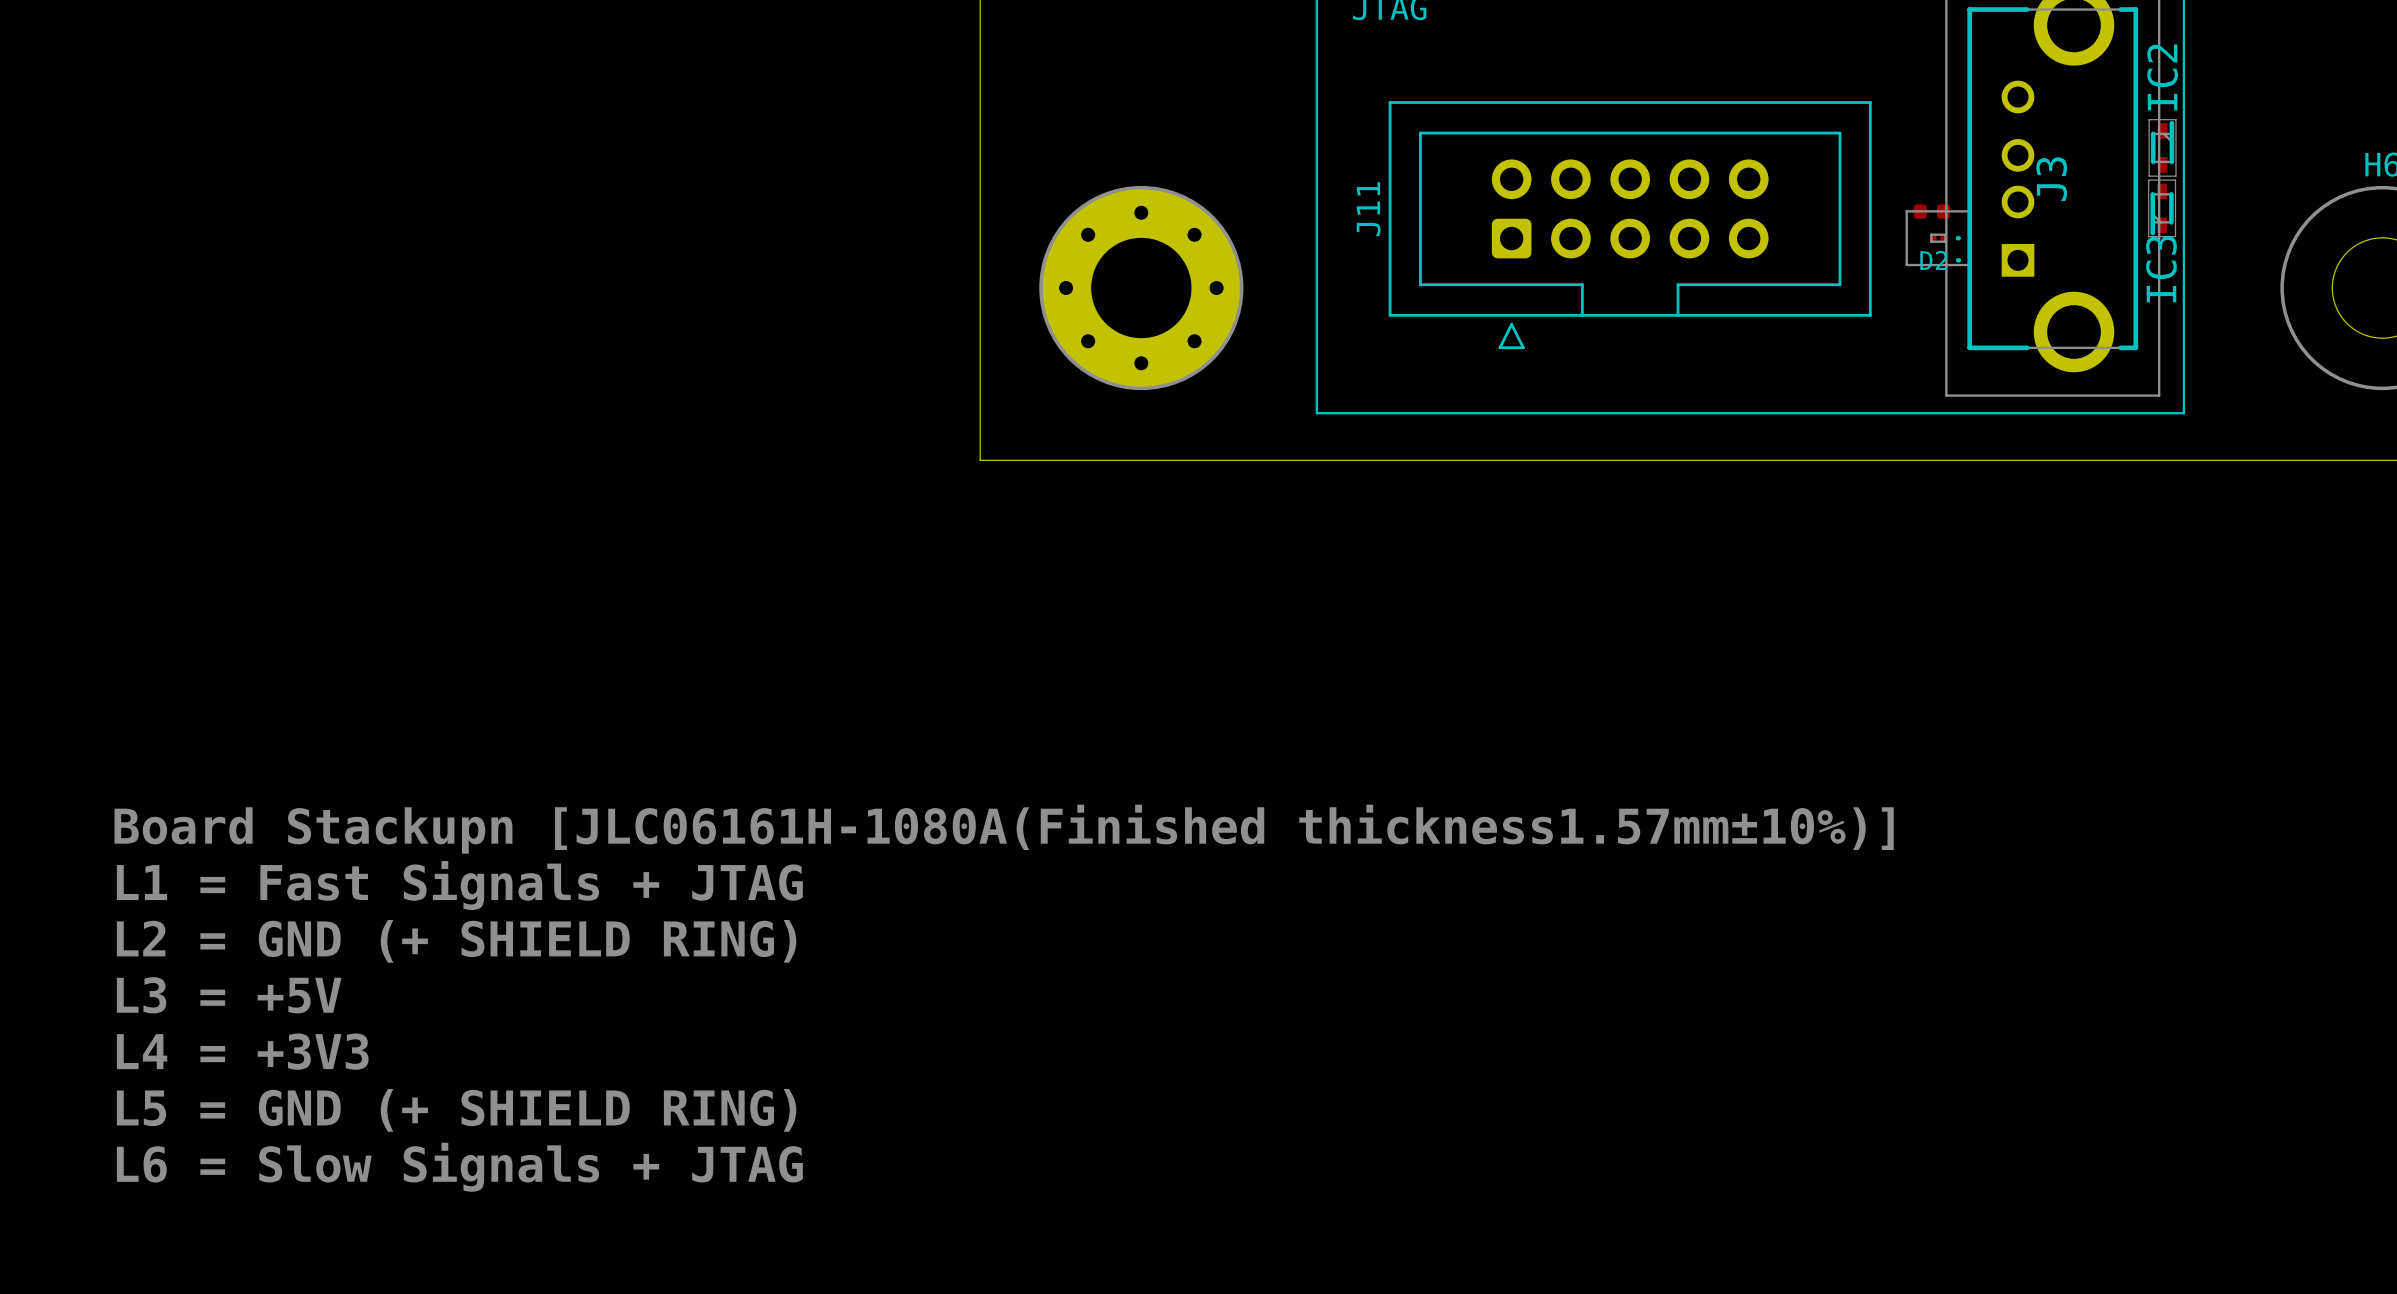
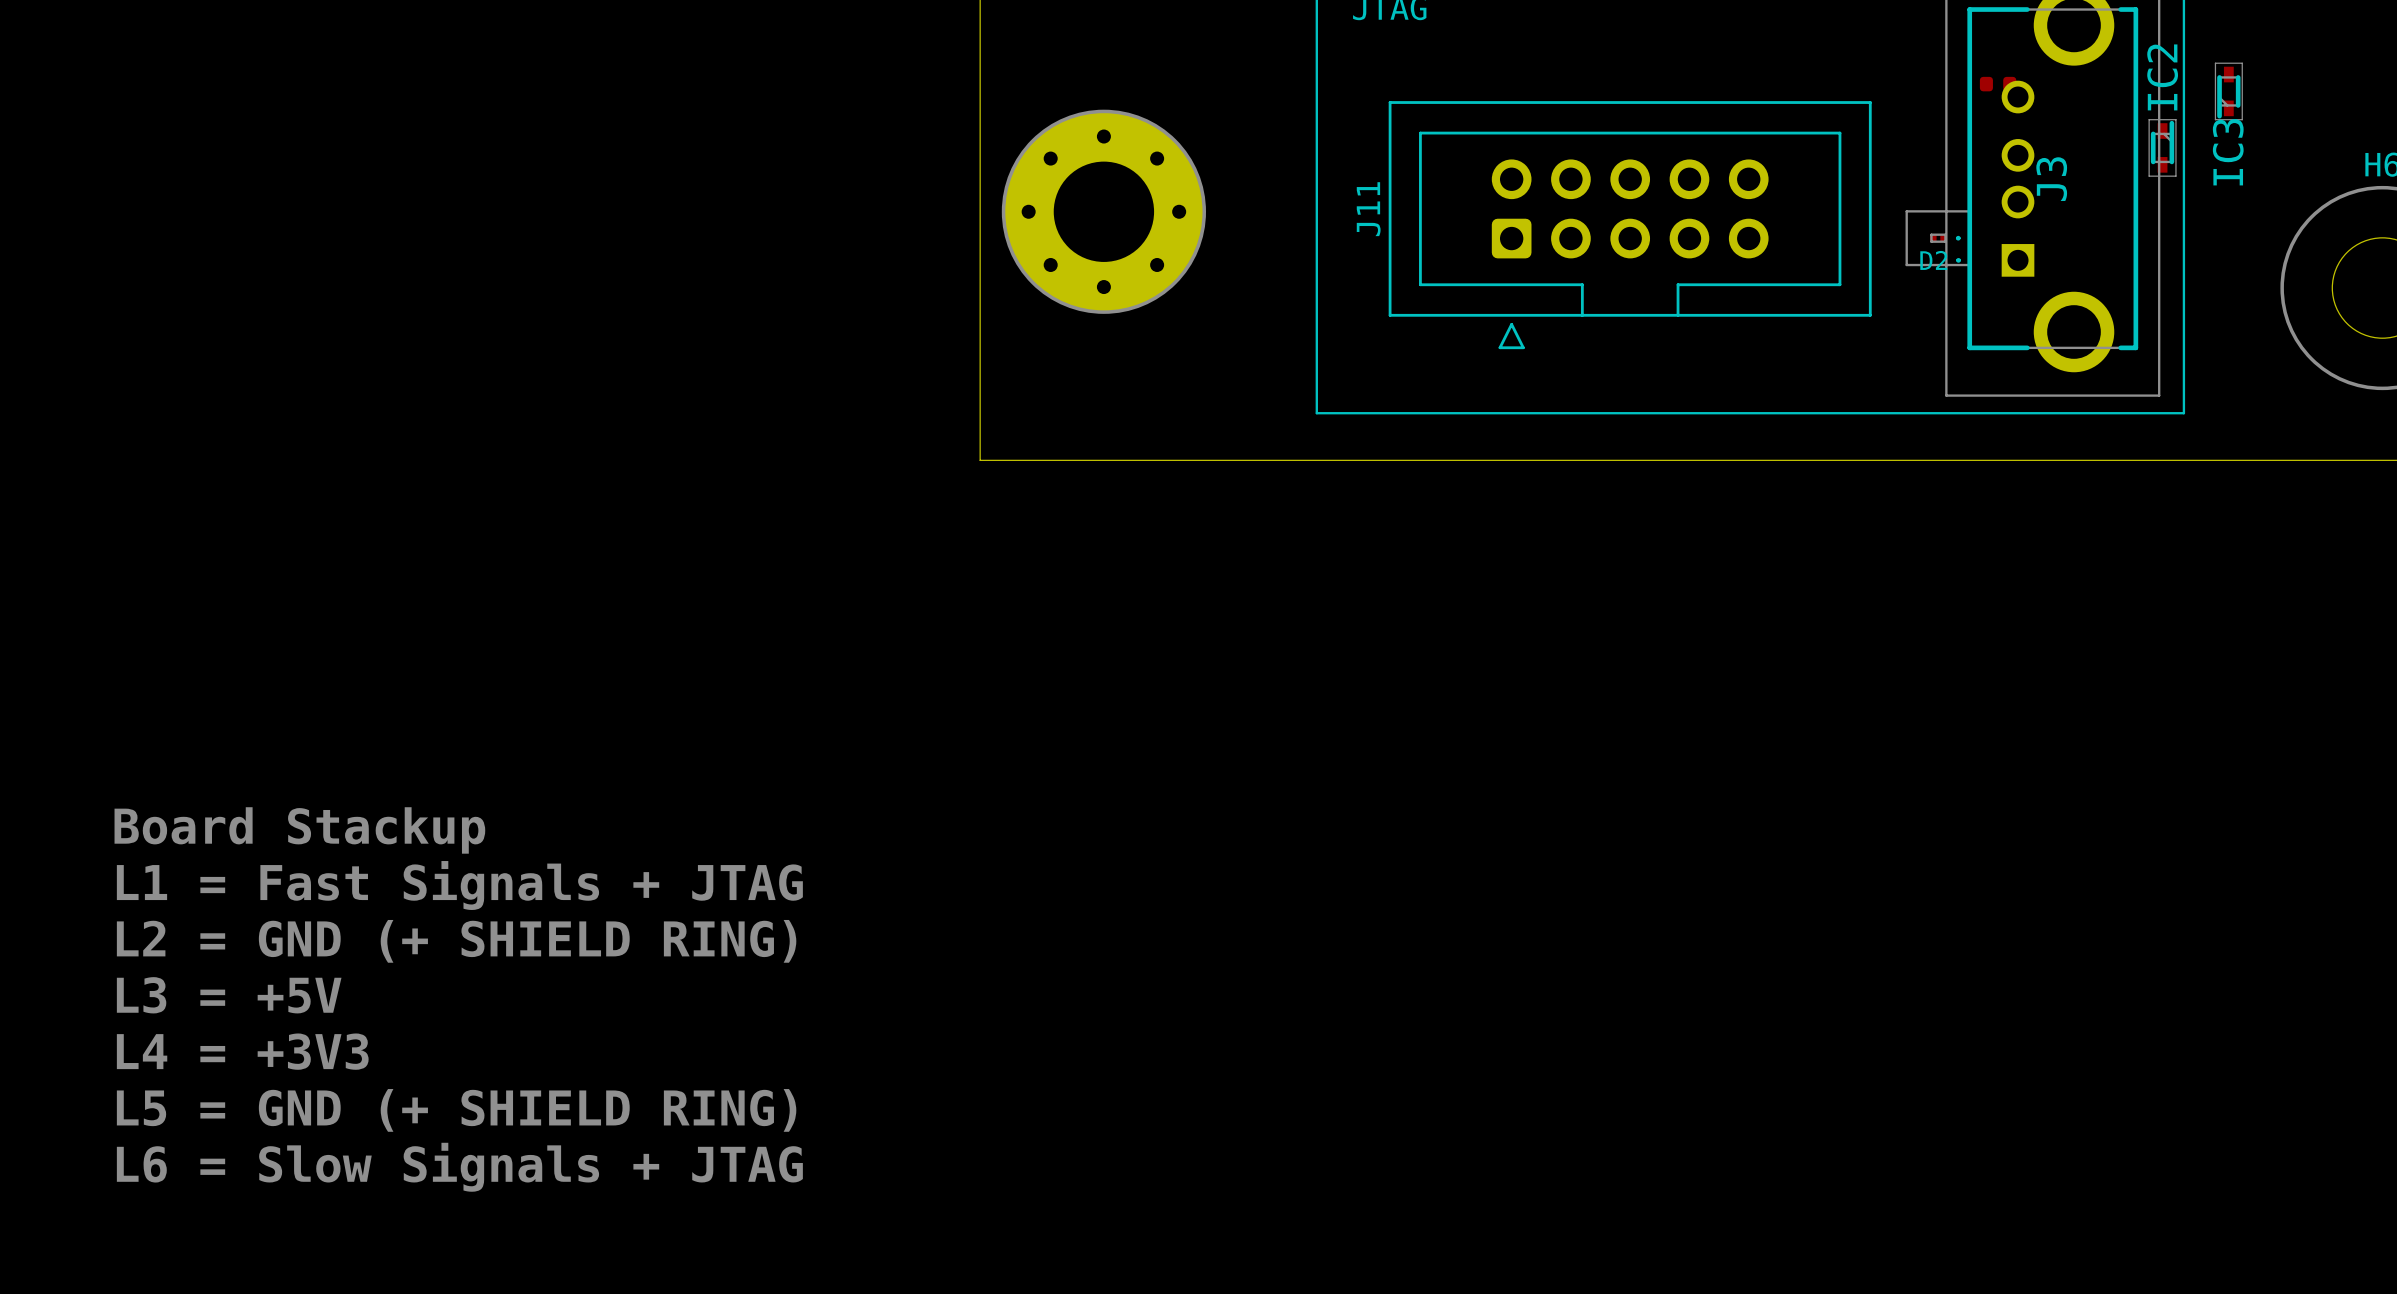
IC3 position: (2162, 208) -> (2228, 91)
part position: (1931, 211) -> (1998, 84)
part position: (1141, 288) -> (1103, 211)
text: Board Stackupn [JLC06161H-1080A(Finished thickness1.57mm±10%)] (1004, 829) -> Board Stackup (299, 830)

